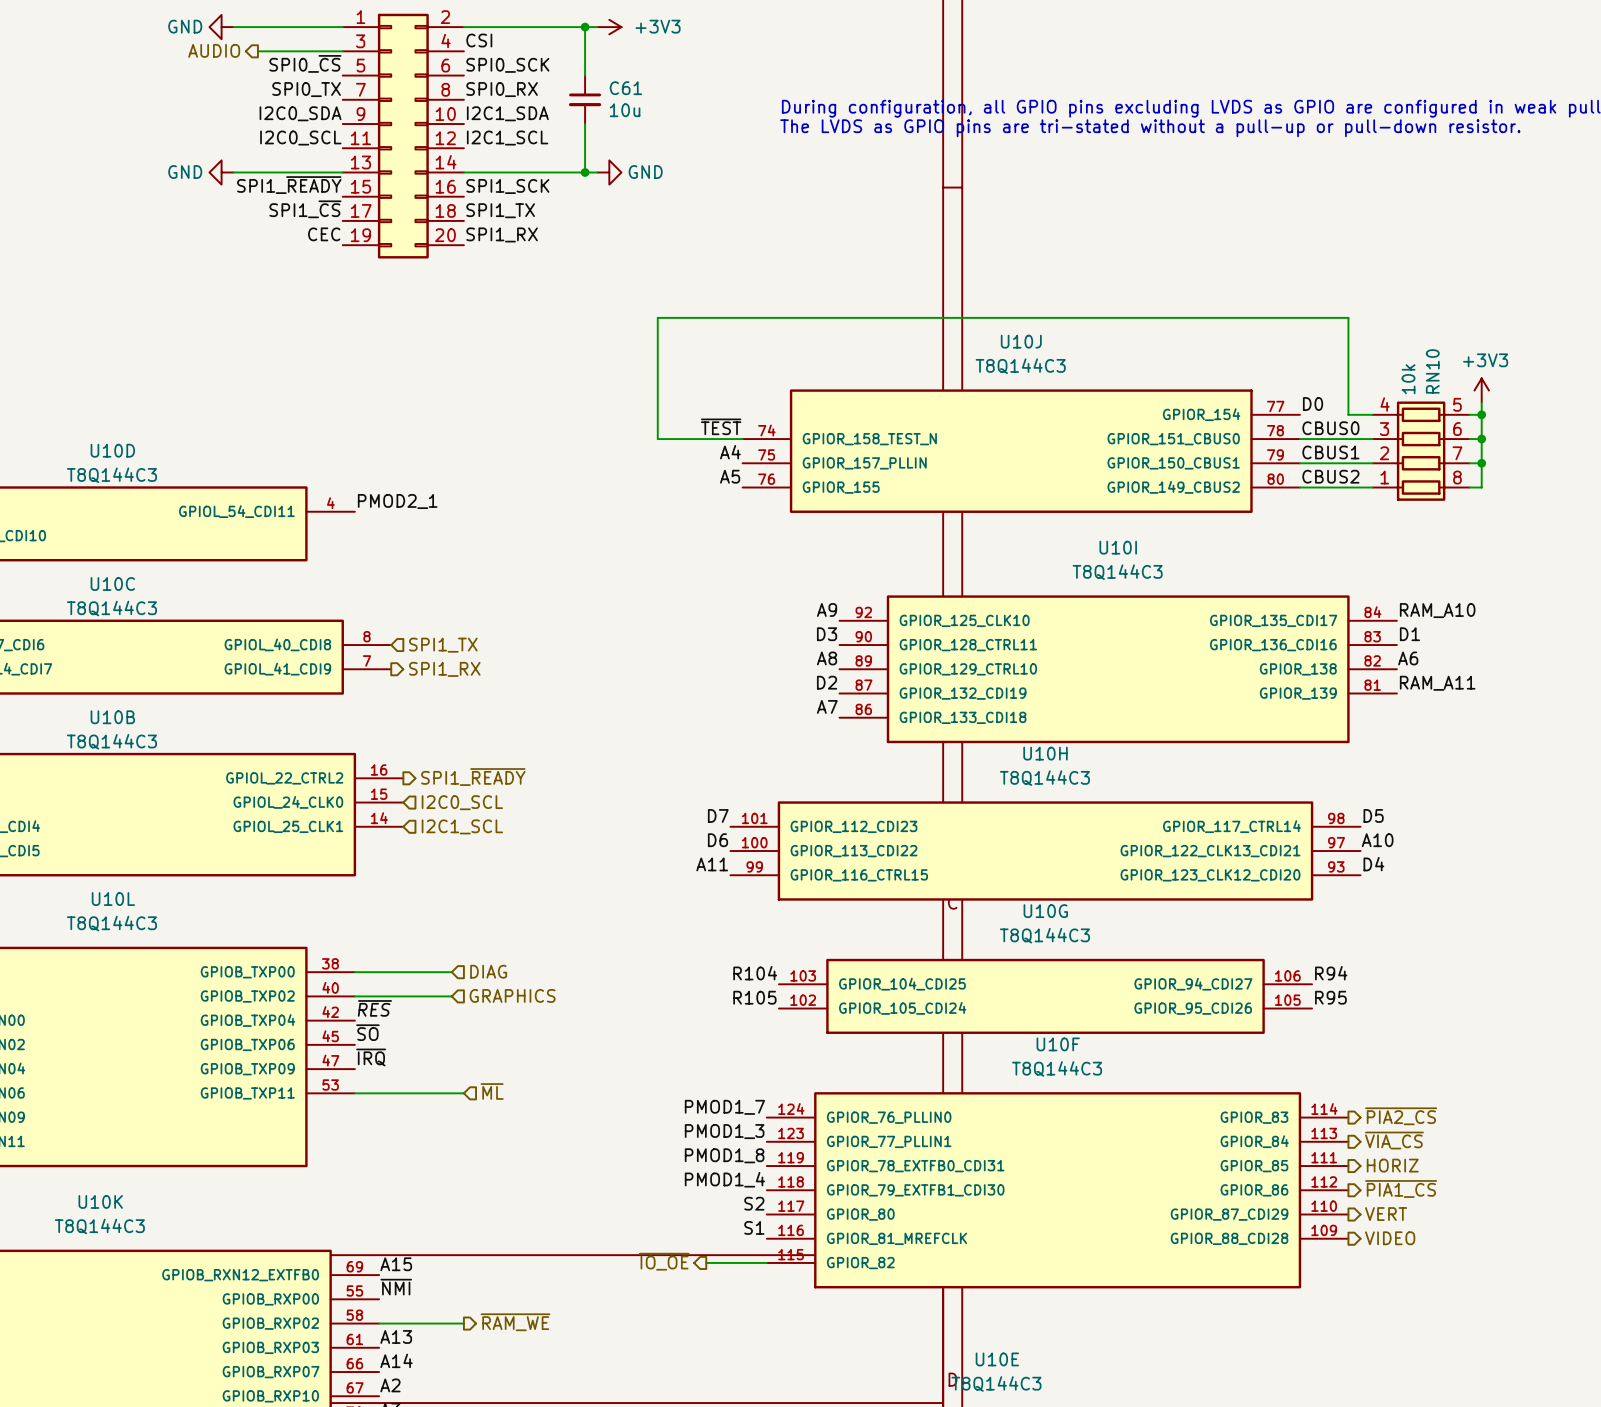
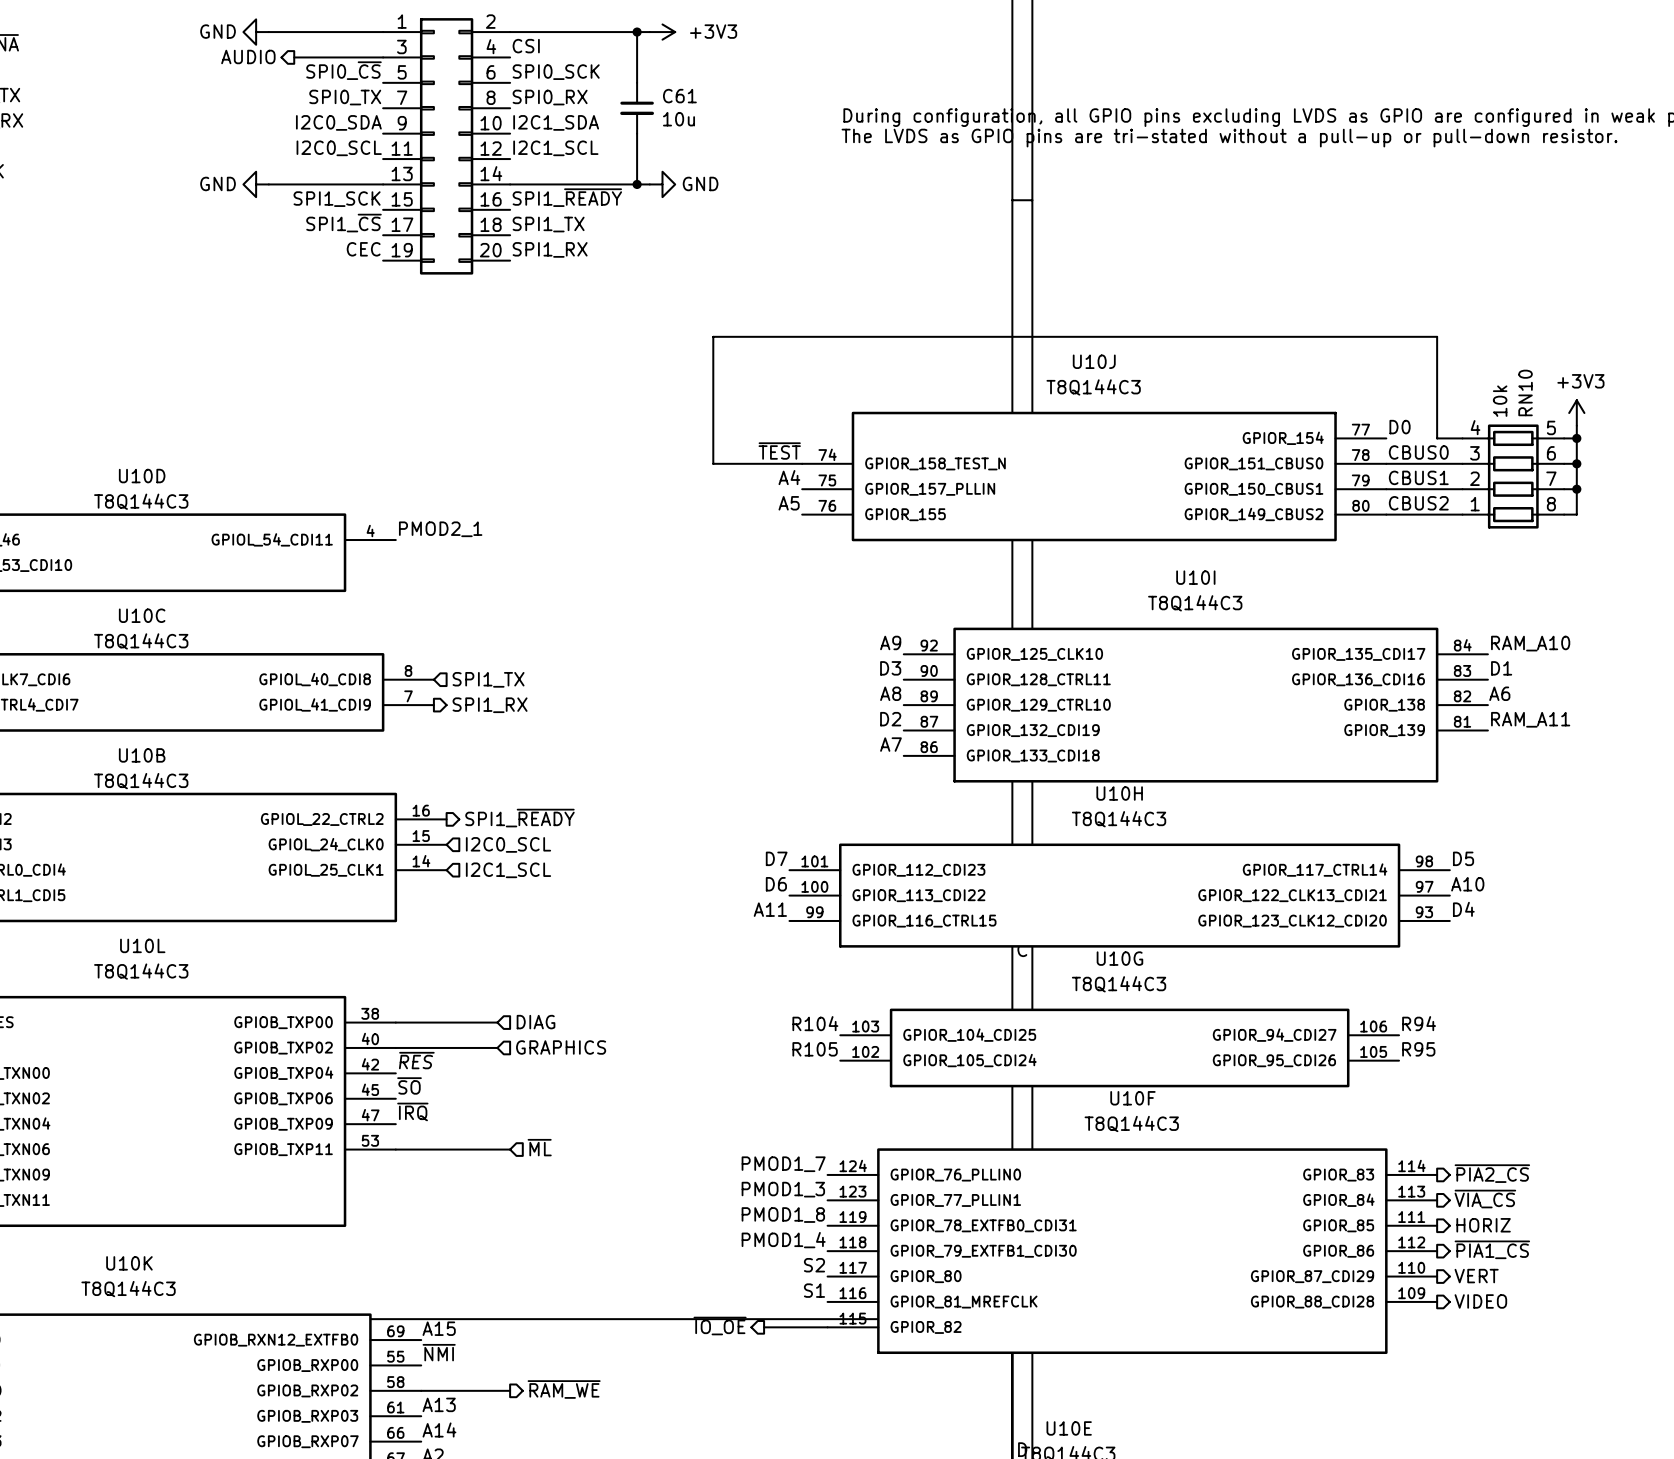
label: SPI1_~{READY} (289, 185) -> SPI1_SCK (337, 199)
label: SPI1_SCK (507, 186) -> SPI1_~{READY} (567, 197)

